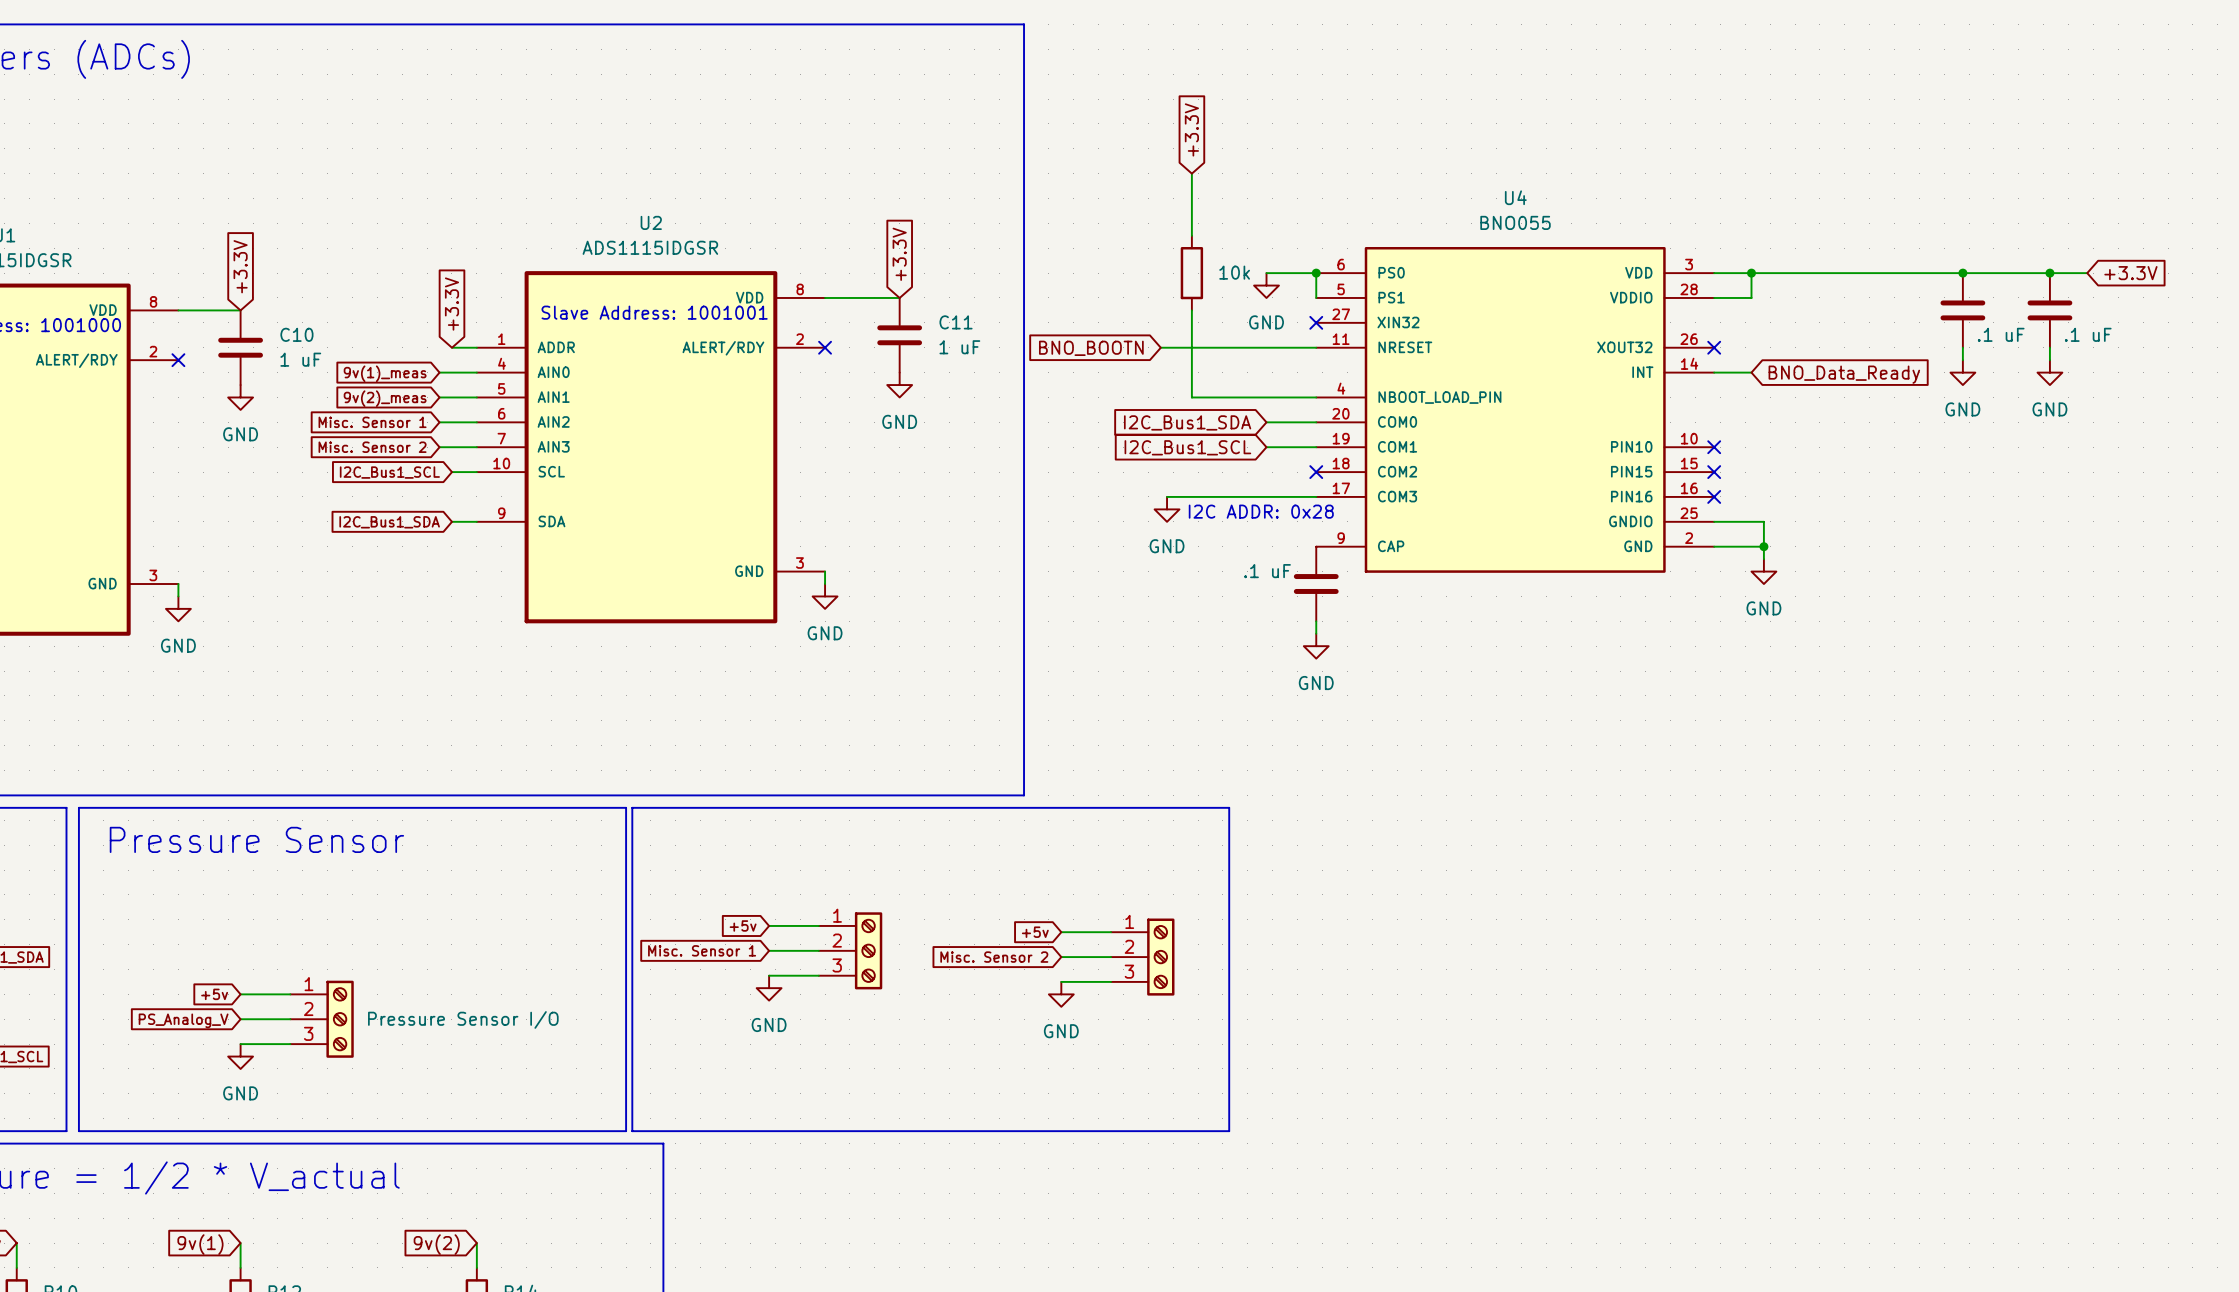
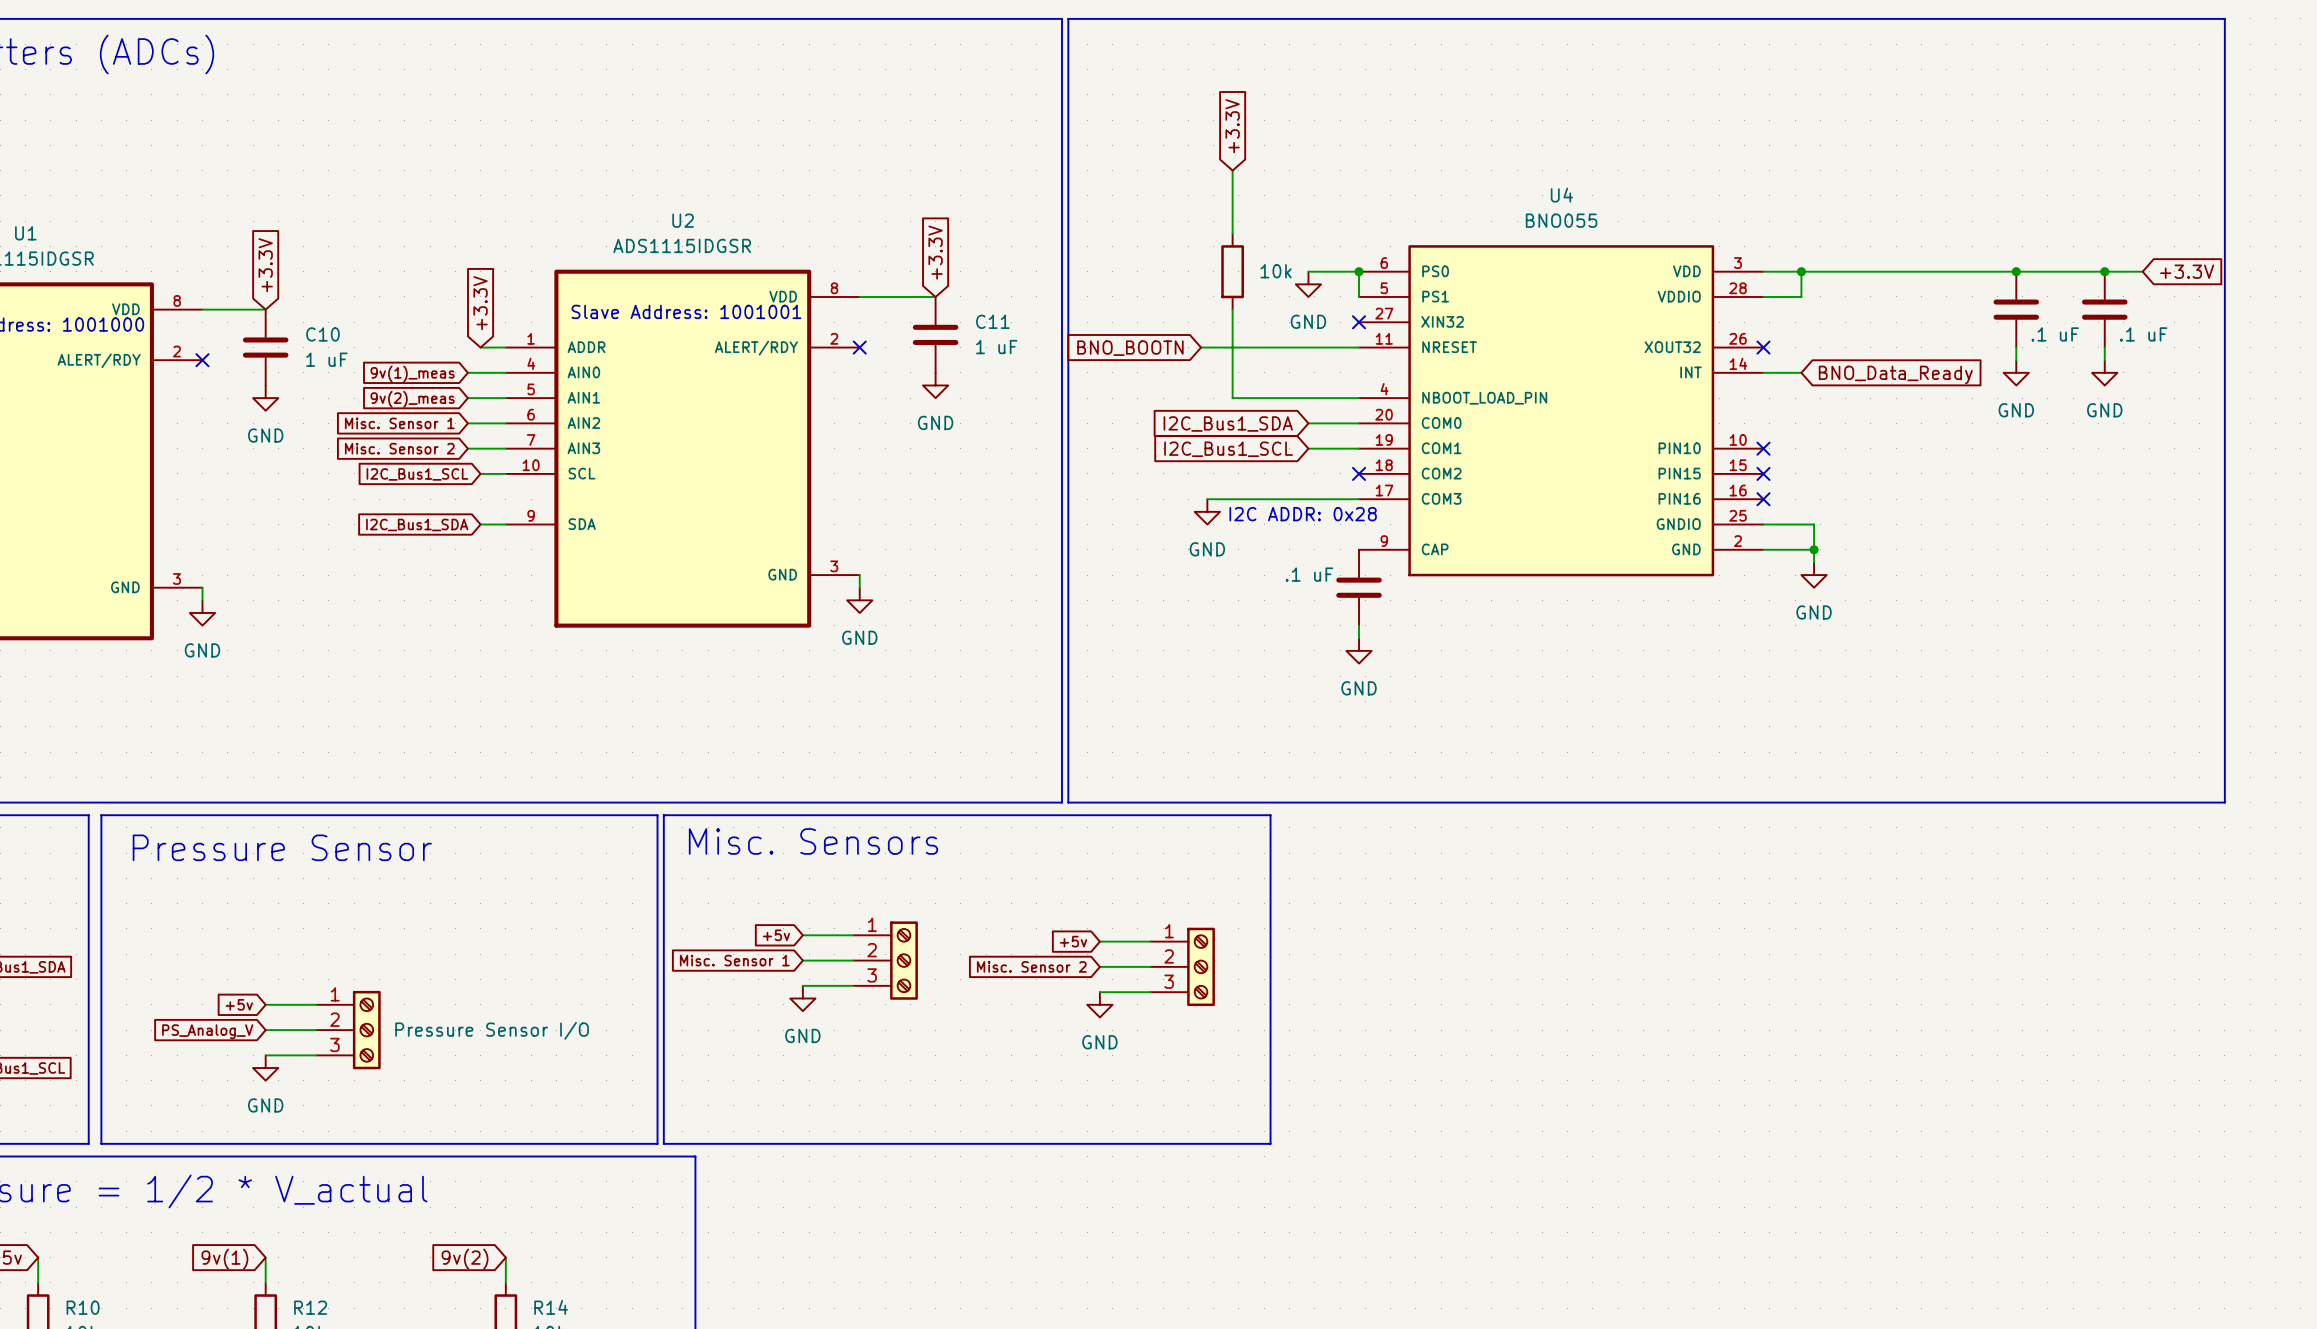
line: none -> (1068, 18) (2224, 18) (2224, 802) (1068, 802) (1068, 18)
text: none -> Misc. Sensors (813, 841)

